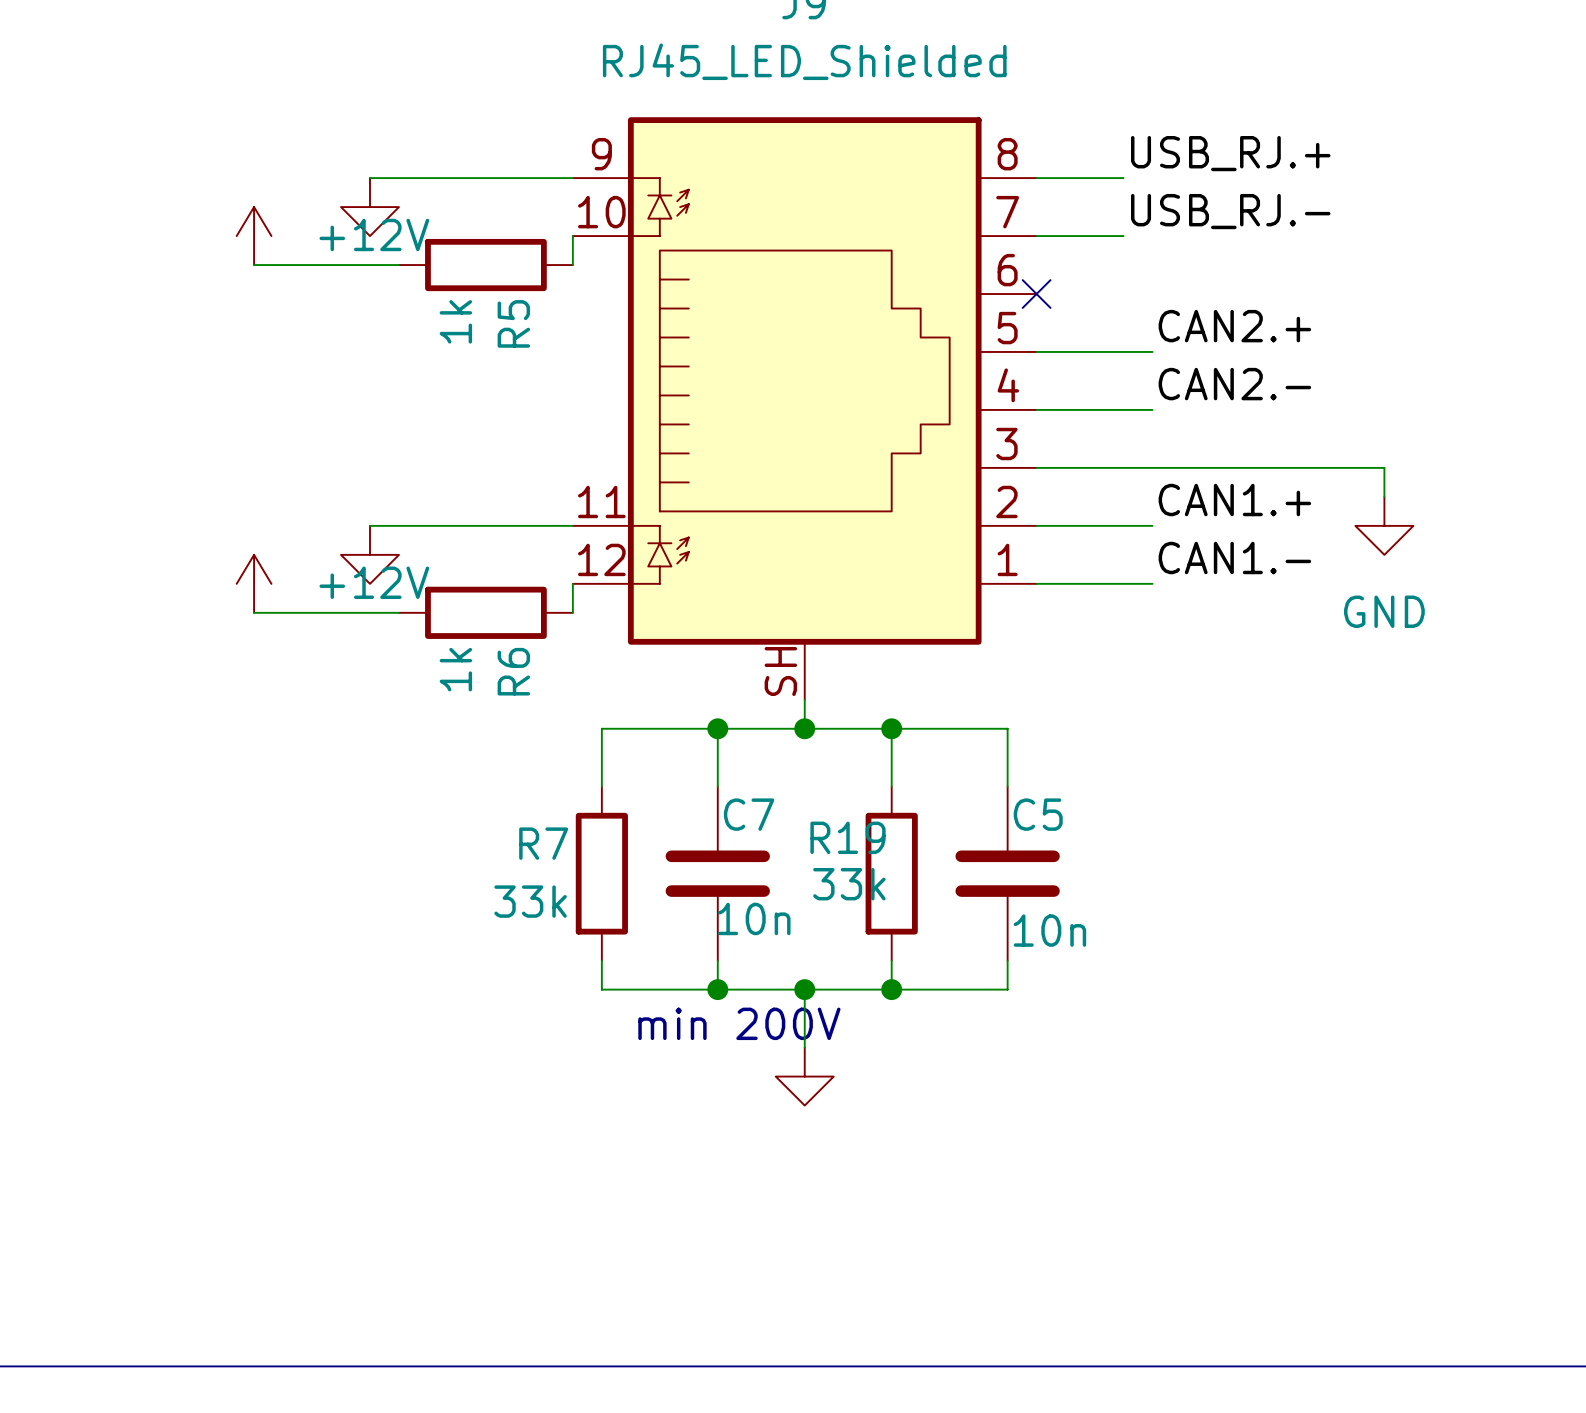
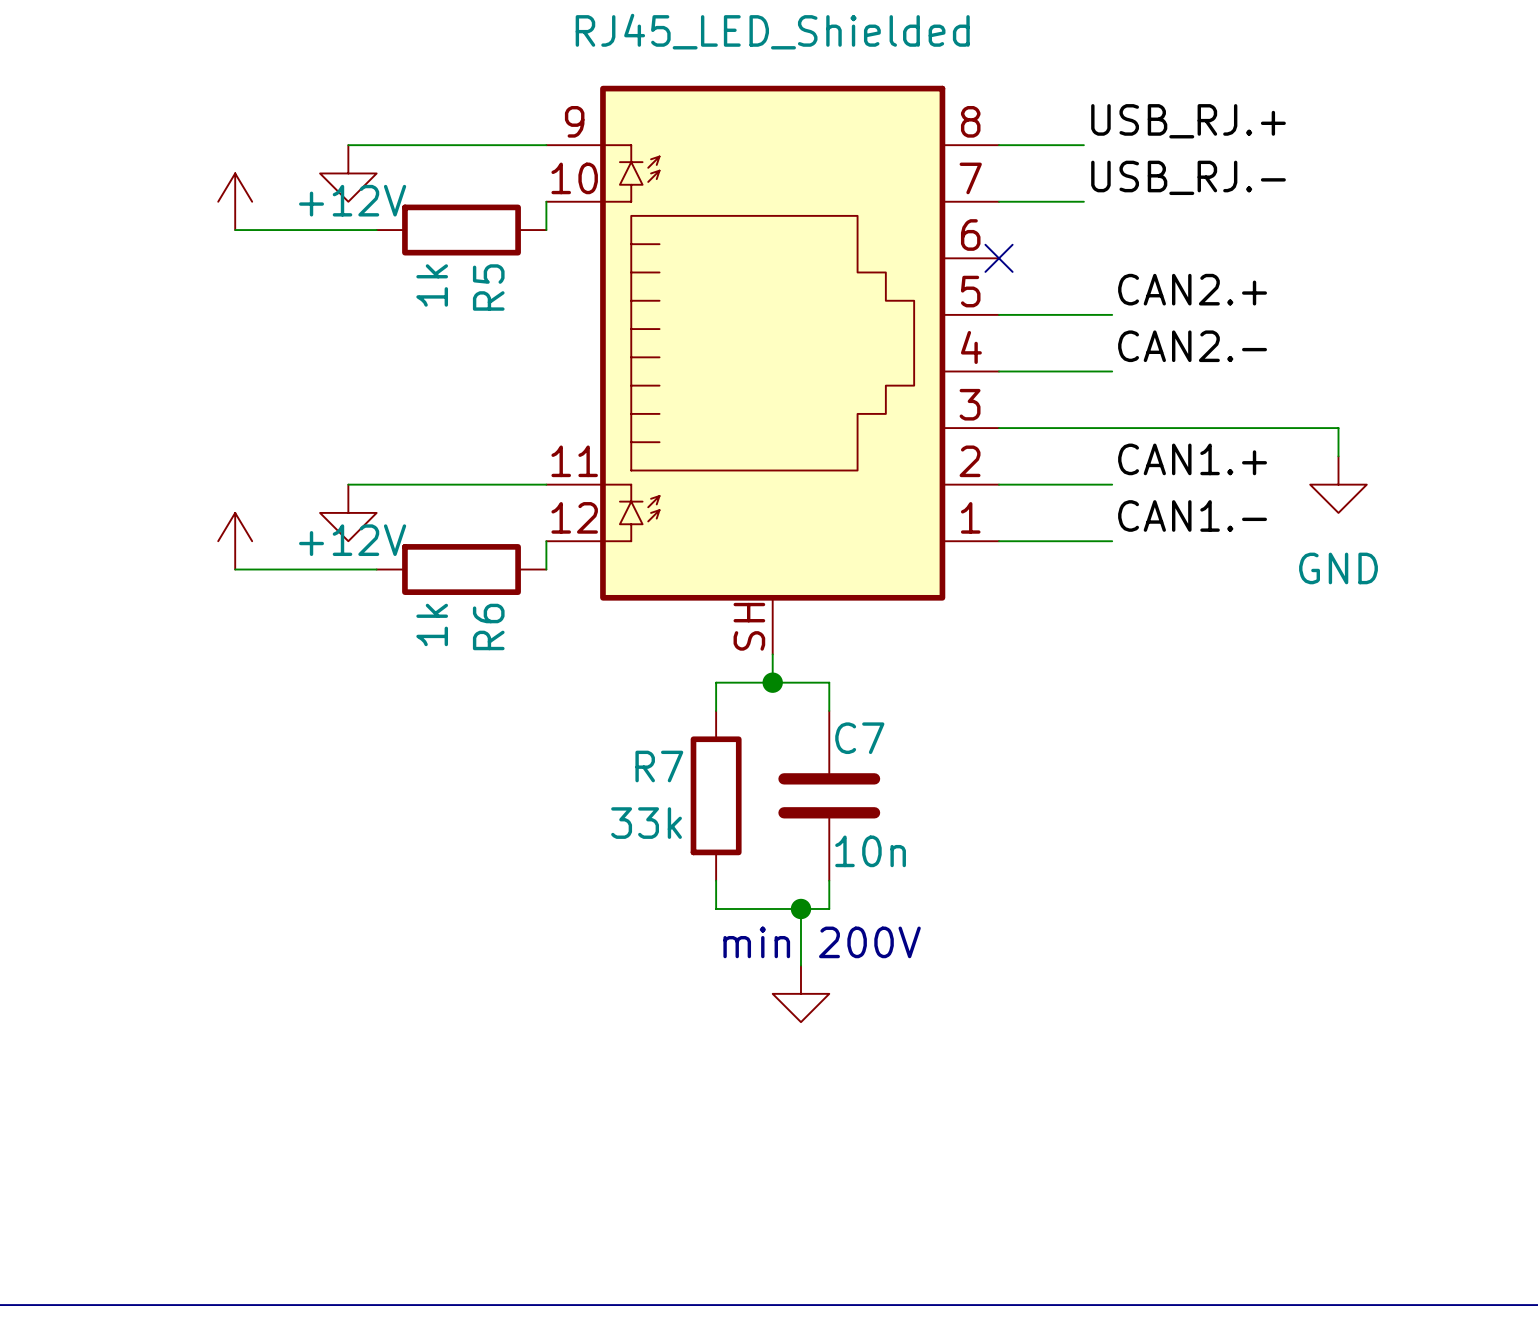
wire: (717, 728) (717, 786) -> none
junction: (717, 728) -> none
wire: (746, 728) (601, 728) (601, 786) -> (716, 682) (716, 710)
wire: (862, 728) (1007, 728) (1007, 786) -> (829, 682) (829, 710)
wire: (891, 728) (891, 786) -> none
junction: (891, 728) -> none
R7 position: (601, 873) -> (716, 795)
C7 position: (717, 873) -> (829, 795)
R19: 33k (891, 873) -> none
C5: 10n (1007, 873) -> none
C7 value position: 10n (754, 918) -> 10n (870, 851)
wire: none -> (716, 880) (716, 908) (829, 908) (829, 880)
wire: (601, 960) (601, 989) (1007, 989) (1007, 960) -> none
wire: (717, 960) (717, 989) -> none
junction: none -> (800, 908)
wire: (891, 960) (891, 989) -> none
junction: (717, 989) -> none
wire: (804, 989) (804, 1047) -> (800, 908) (800, 965)
junction: (804, 989) -> none
junction: (891, 989) -> none
text position: min 200V (739, 1023) -> min 200V (822, 942)
power symbol position: (804, 1076) -> (800, 993)

